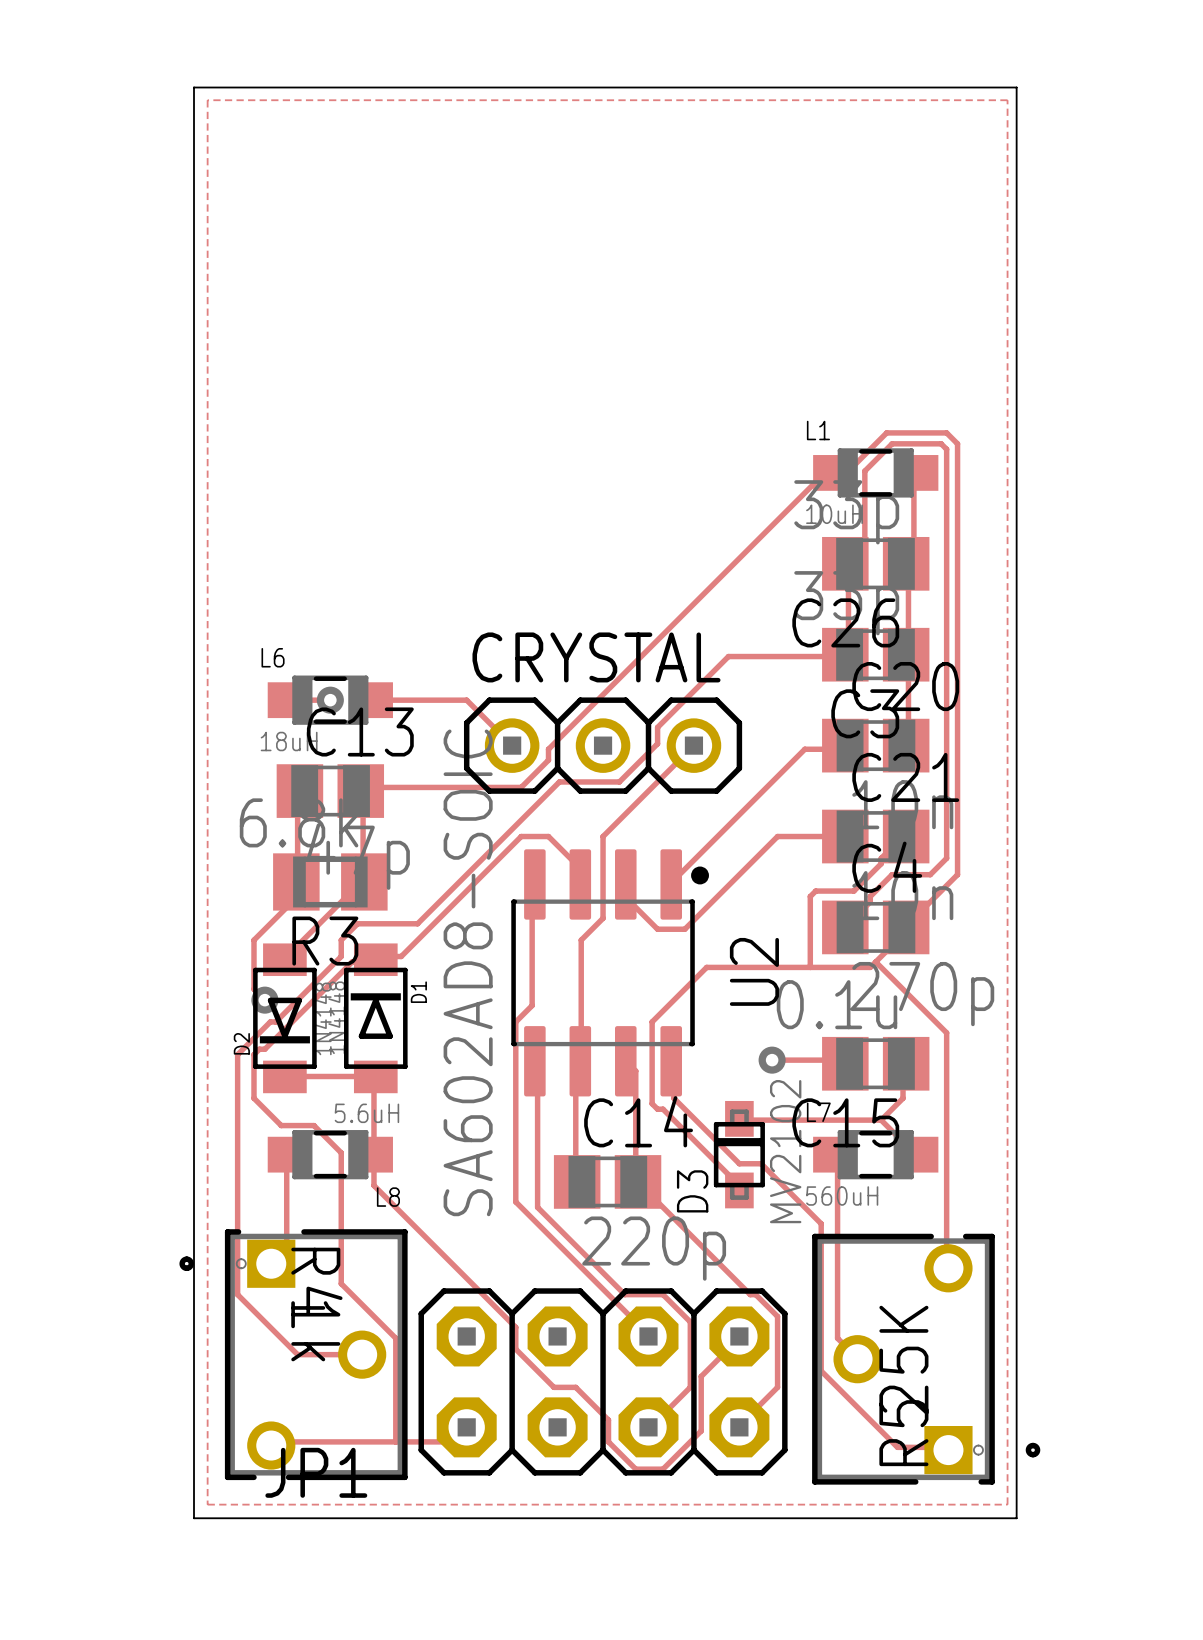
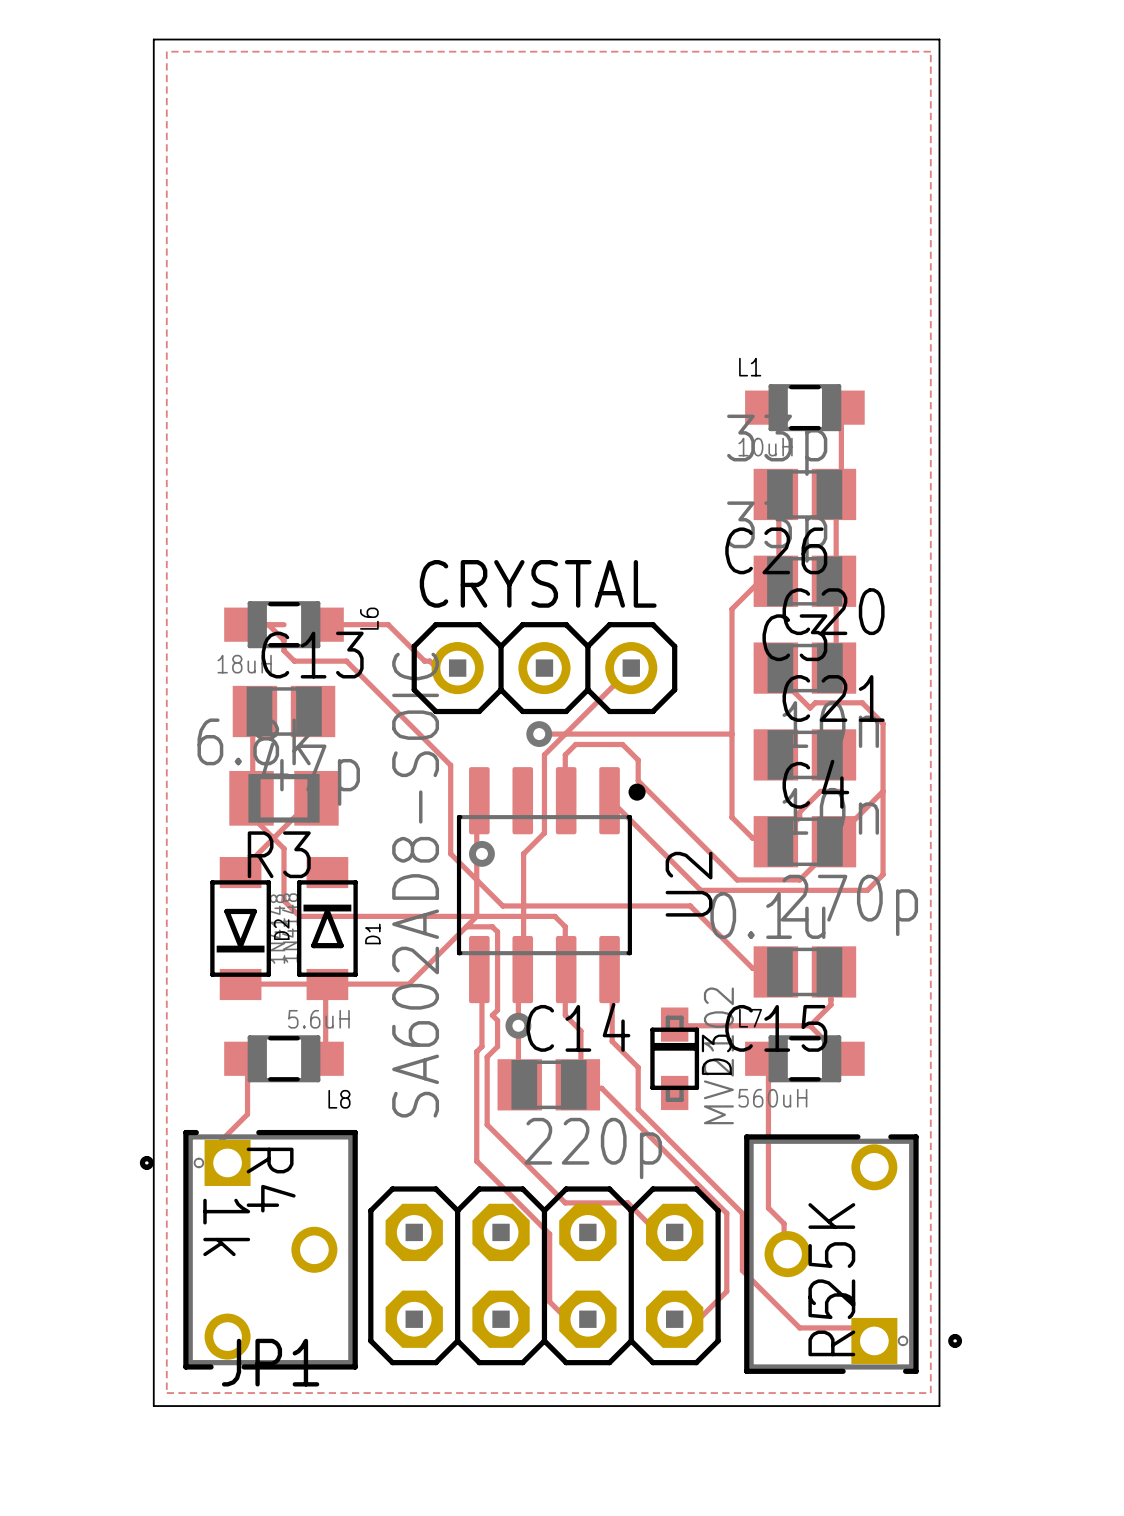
track: (848, 563) (864, 547) (864, 471) (892, 443) (941, 443) (946, 449) (946, 858) (930, 874) (913, 874) -> none
track: (826, 656) (728, 656) (657, 727) (657, 743) (619, 781) (559, 781) (417, 923) (357, 923) (341, 940) (341, 956) (275, 1021) (270, 1021) (237, 1054) (237, 1294) (297, 1354) (362, 1354) -> (758, 583) (731, 609) (731, 817) (752, 838) (773, 838) (775, 841)
L6 name rotation: 0° (273, 657) -> 90° counterclockwise (369, 618)
L6 name position: L6 (273, 657) -> L6 (369, 618)
via: (330, 700) -> none
track: (439, 700) (466, 700) (510, 743) -> (388, 624) (424, 661) (429, 661) (435, 666) (455, 666)
track: (845, 745) (843, 749) (804, 749) (671, 884) -> (883, 791) (883, 874) (867, 890) (700, 890) (617, 807) (612, 807) (606, 801) (609, 800)
track: (957, 803) (957, 443) (946, 432) (886, 432) (848, 471) (837, 471) (832, 476) (821, 476) (548, 749) (548, 760) (521, 787) (363, 787) (360, 791) (363, 792) (364, 881) -> (883, 723) (862, 702) (815, 702) (810, 708) (794, 692) (794, 687) (775, 668)
track: none -> (539, 734) (731, 734)
via: none -> (539, 734)
track: (845, 836) (777, 836) (684, 929) (657, 929) (630, 901) (630, 885) (625, 884) -> (737, 879) (638, 780) (638, 760) (622, 744) (575, 744) (565, 754) (566, 800)
track: (906, 836) (903, 836) (881, 858) (881, 863) (853, 891) (815, 891) (810, 896) (810, 967) -> none
track: (296, 881) (292, 885) (292, 901) (253, 940) (253, 989) (264, 1000) -> none
track: (580, 884) (575, 880) (575, 863) (548, 836) (521, 836) (401, 956) (379, 956) (373, 961) (352, 961) (264, 1049) (259, 1049) (253, 1054) (253, 1098) (281, 1125) (313, 1125) (341, 1152) (341, 1283) (395, 1338) (395, 1441) -> none
via: none -> (481, 853)
track: (875, 961) (946, 1032) (946, 1267) (948, 1268) -> none
track: (804, 967) (706, 967) (652, 1021) (652, 1103) (657, 1109) (663, 1109) (739, 1185) (739, 1190) -> none
D1 name position: D1 (418, 992) -> D1 (372, 933)
via: (264, 1000) -> none
track: none -> (466, 926) (492, 926) (497, 932) (497, 1010) (492, 1015) (497, 1020) (497, 1046) (487, 1057) (487, 1124) (565, 1202) (627, 1202) (674, 1249) (676, 1254)
track: (515, 1021) (515, 1201) (648, 1336) -> (461, 932) (409, 984) (327, 984)
D2 name position: D2 (241, 1043) -> D2 (281, 929)
track: (772, 1060) (821, 1060) -> (268, 624) (284, 640) (284, 650) (294, 661) (346, 661) (450, 765) (450, 853) (502, 905) (690, 905) (752, 968)
via: (772, 1060) -> none
track: (625, 1061) (635, 1071) (635, 1180) (638, 1181) -> (251, 798) (252, 817) (284, 848) (284, 900) (299, 916) (554, 916) (565, 926) (565, 1015) (580, 1030) (580, 1083) (577, 1084)
track: (673, 1098) (739, 1163) (761, 1163) (821, 1223) (821, 1371) (897, 1447) (946, 1447) -> (612, 1004) (612, 1041) (638, 1067) (638, 1109) (742, 1213) (742, 1270) (799, 1327) (862, 1327) (872, 1338)
via: none -> (518, 1025)
track: (537, 1141) (537, 1207) (624, 1294) (663, 1294) (690, 1321) (690, 1387) (648, 1427) -> (481, 1046) (476, 1051) (476, 1161) (549, 1234) (549, 1301) (589, 1340)
track: (288, 1154) (286, 1158) (286, 1251) (271, 1263) -> (243, 1058) (247, 1062) (247, 1114) (221, 1140) (221, 1161) (218, 1162)
track: (372, 1154) (373, 1185) (515, 1327) (515, 1349) (553, 1387) (575, 1387) (608, 1420) (608, 1441) (635, 1469) (663, 1469) (701, 1431) (701, 1376) (739, 1336) -> none
track: (641, 1185) (750, 1294) (755, 1294) (777, 1316) (777, 1387) (739, 1427) -> (580, 1088) (601, 1088) (726, 1213) (726, 1291) (676, 1340)
D3 name position: D3 (692, 1191) -> D3 (716, 1054)
track: (837, 1311) (837, 1338) (853, 1354) -> (768, 1208) (784, 1223) (784, 1249)
R4 value position: 1k (315, 1331) -> 1k (226, 1227)
track: (466, 1427) (466, 1431) (455, 1441) (275, 1441) (271, 1445) -> none

